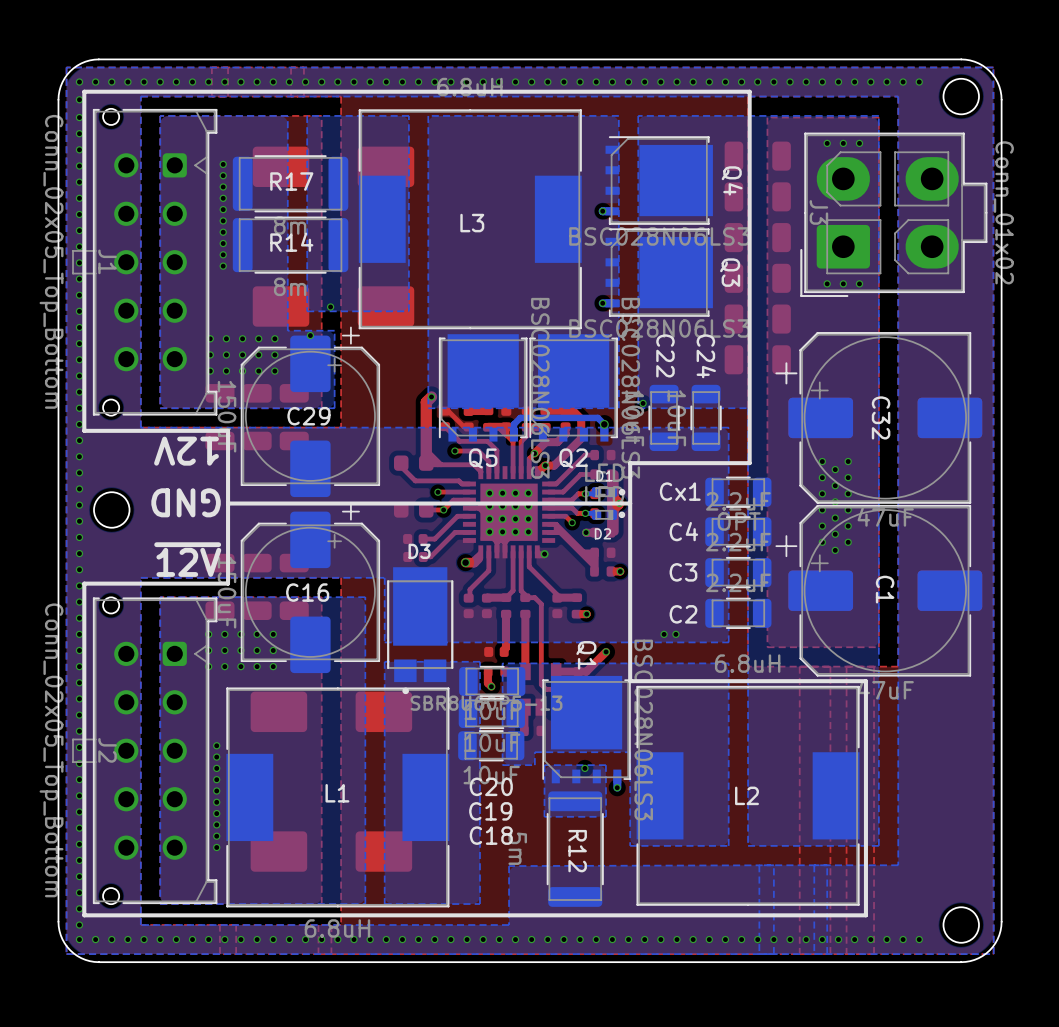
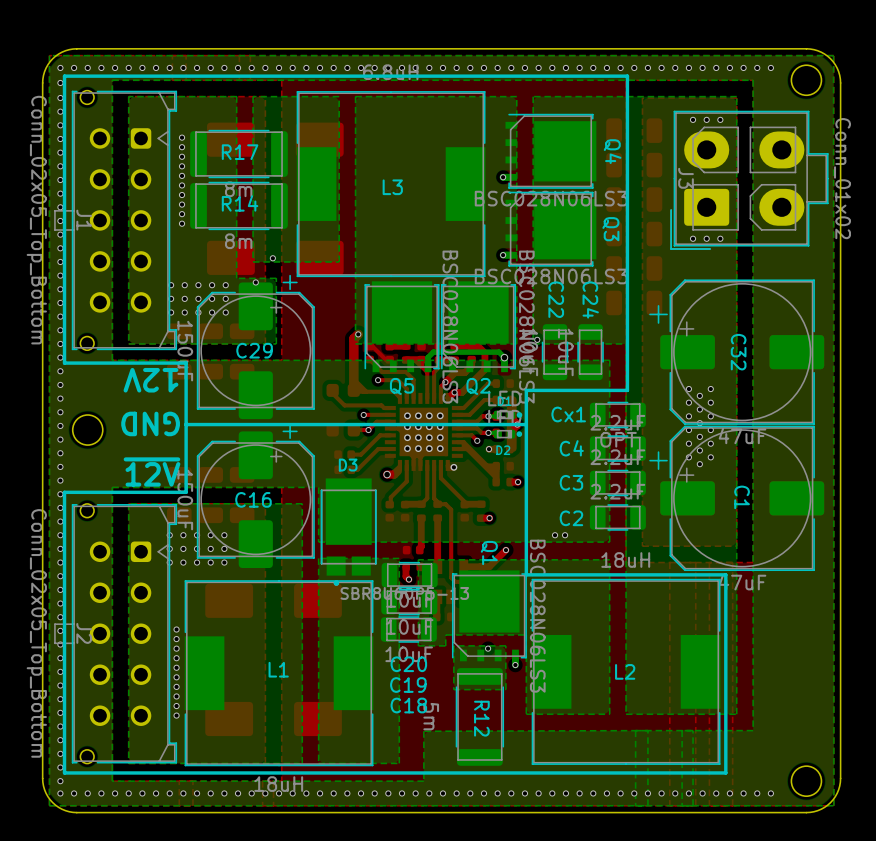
L2 value: 6.8uH (747, 663) -> 18uH (625, 560)
L1 value: 6.8uH (337, 928) -> 18uH (278, 784)

